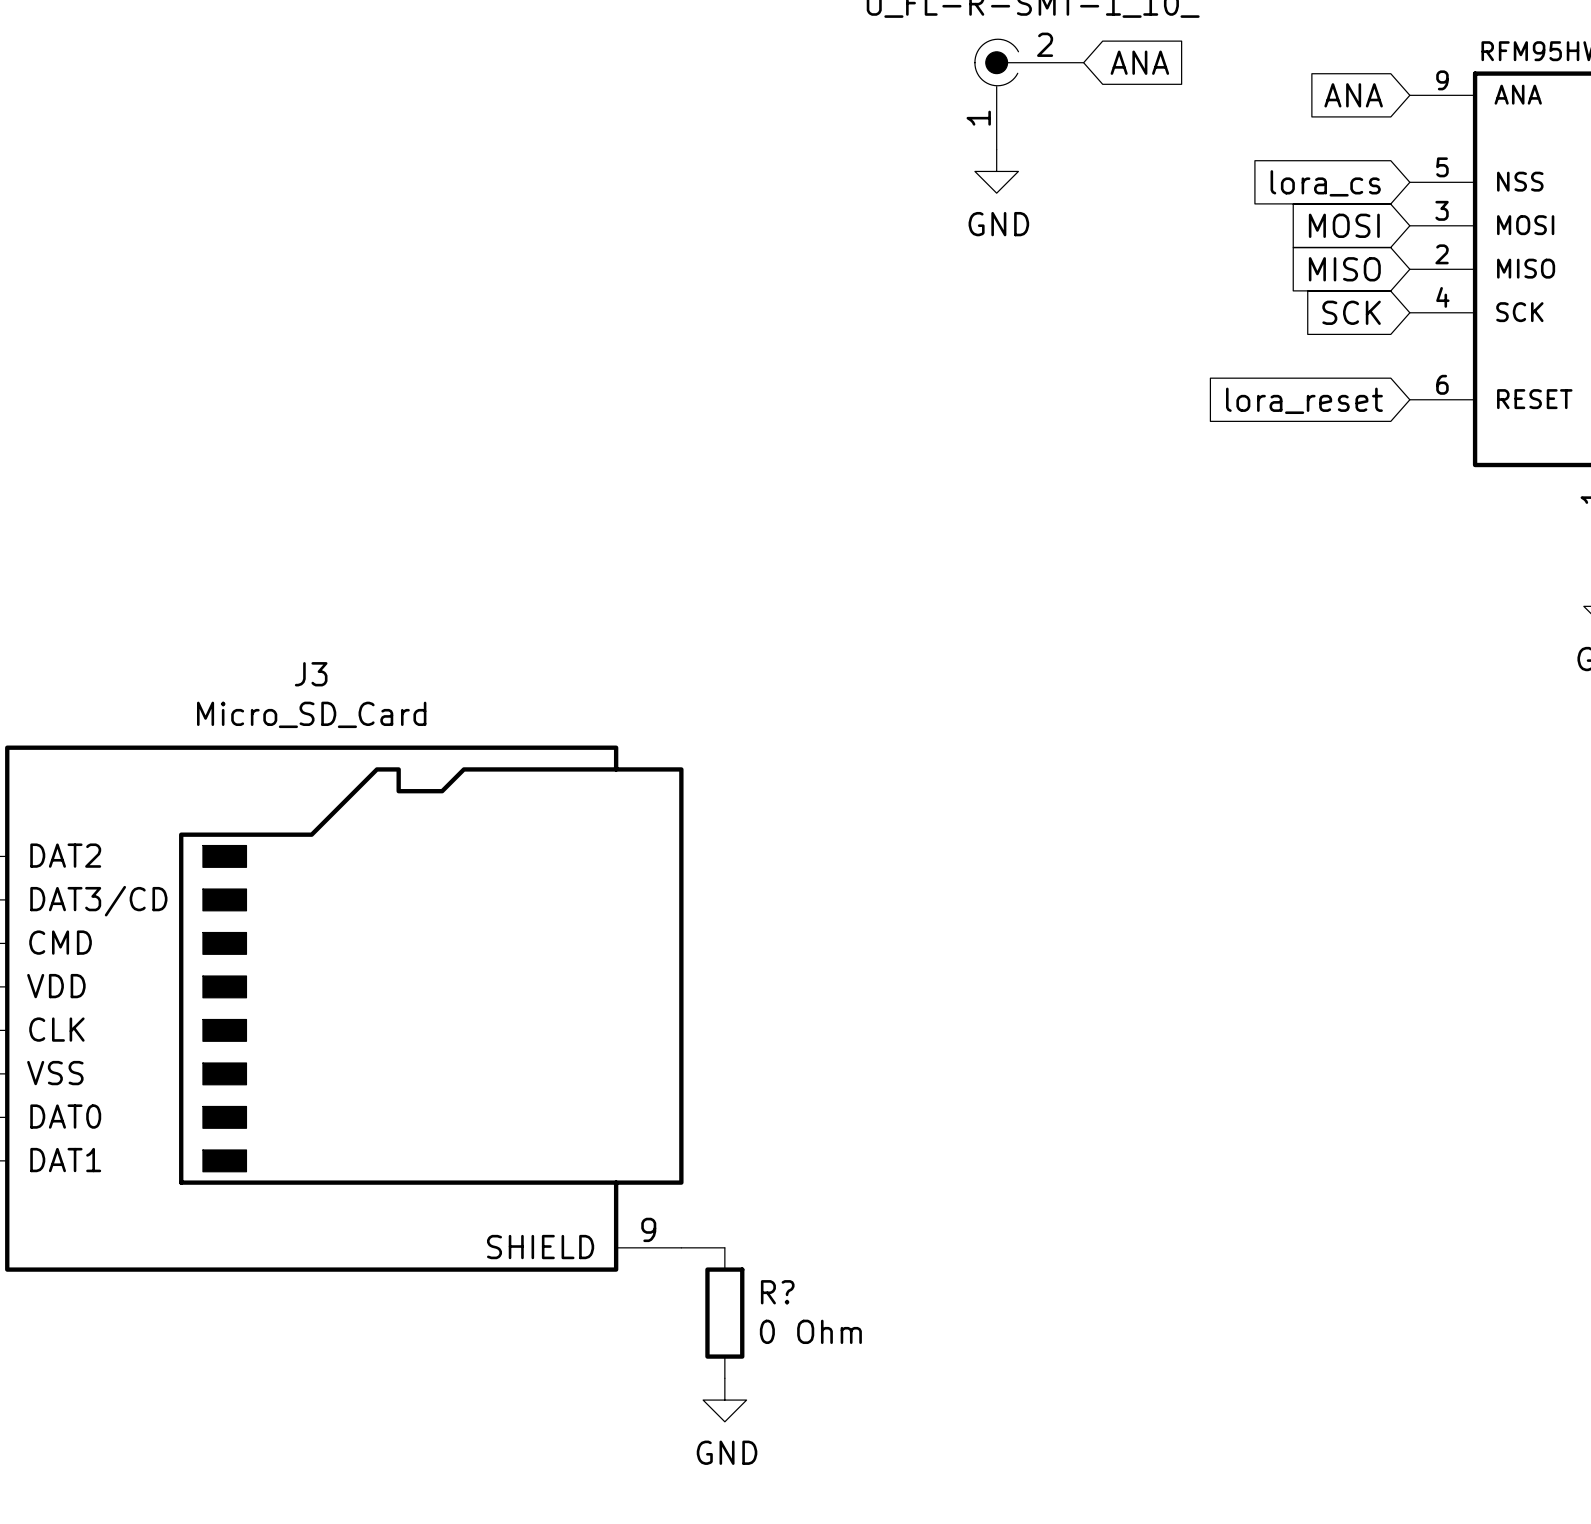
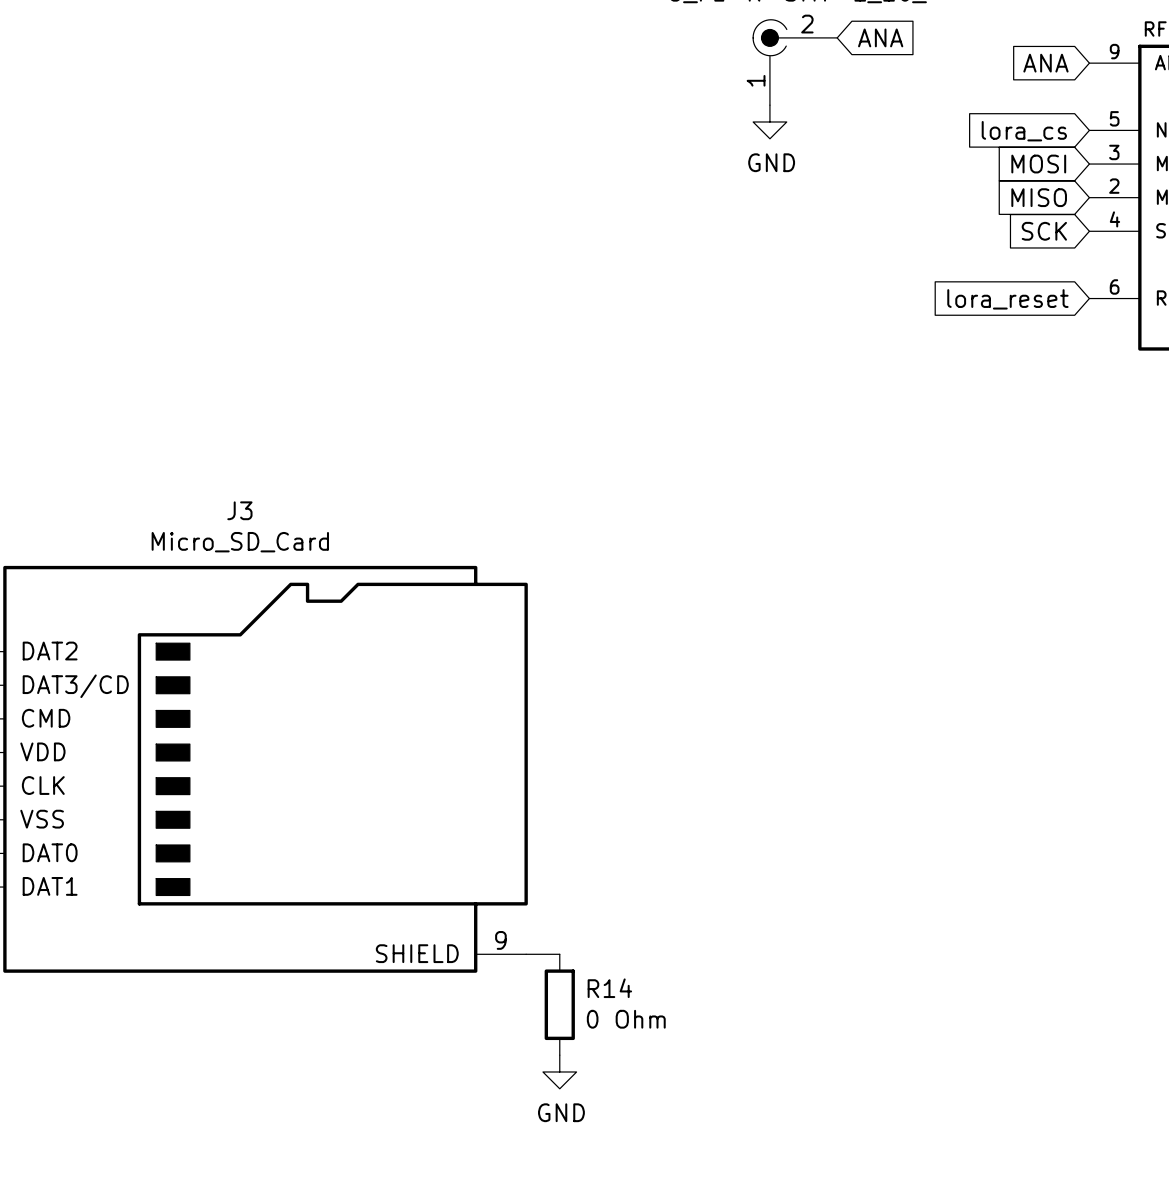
R? name: R? (777, 1292) -> R14 (609, 988)

